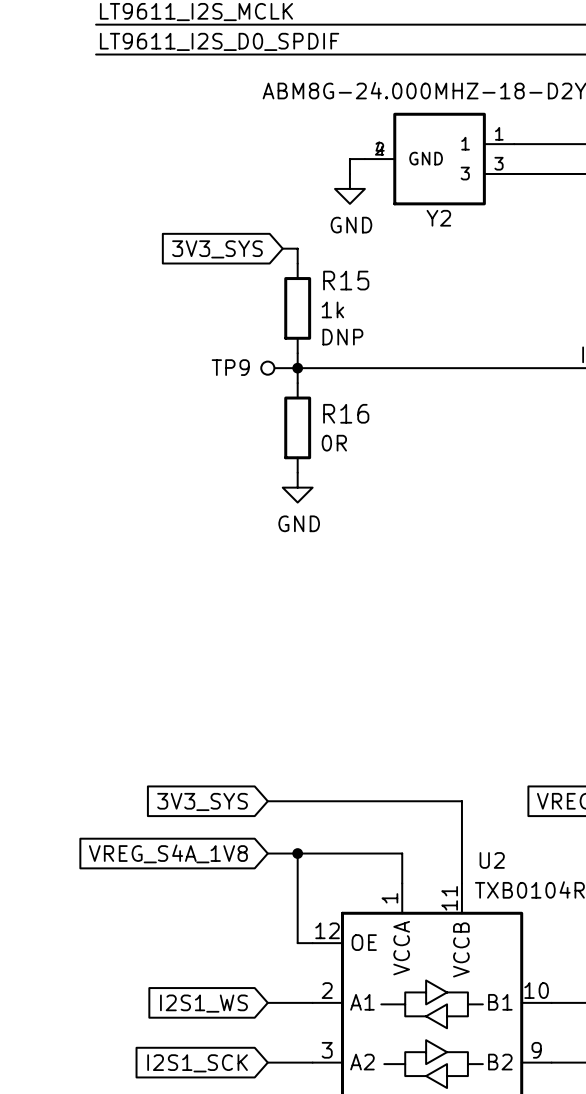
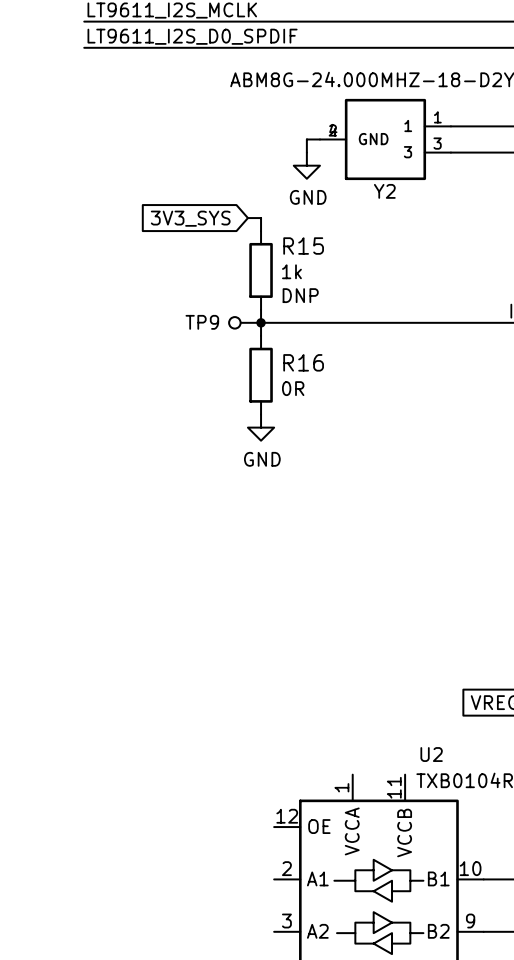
global label: 3V3_SYS (202, 801) -> none
wire: (267, 801) (461, 801) (461, 883) -> none
global label: VREG_S4A_1V8 (168, 853) -> none
wire: (267, 853) (402, 853) (402, 883) -> none
wire: (297, 853) (297, 943) (312, 943) -> none
junction: (297, 853) -> none
wire: (267, 1002) (312, 1002) -> none
global label: I2S1_WS (203, 1003) -> none
wire: (267, 1062) (312, 1062) -> none
global label: I2S1_SCK (197, 1063) -> none

